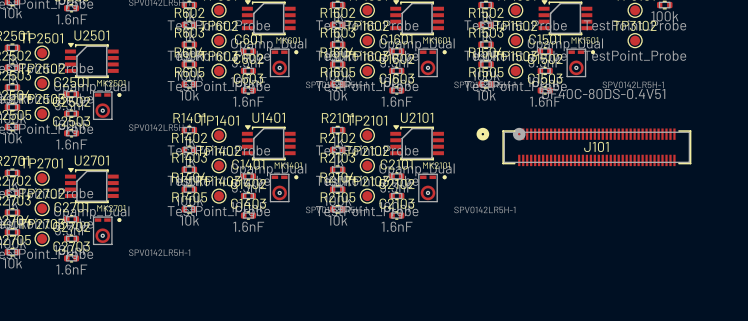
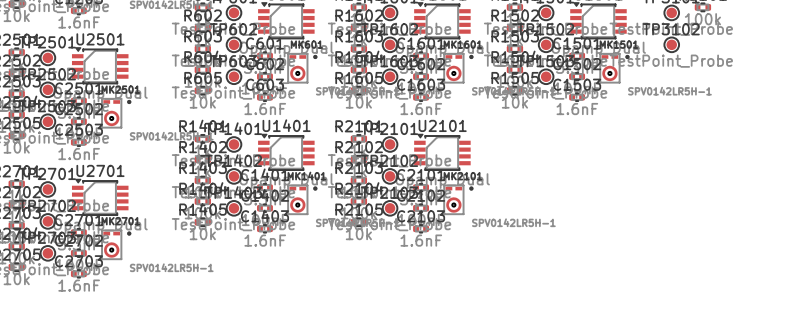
J101: DF40C-80DS-0.4V51 (583, 146) -> none

